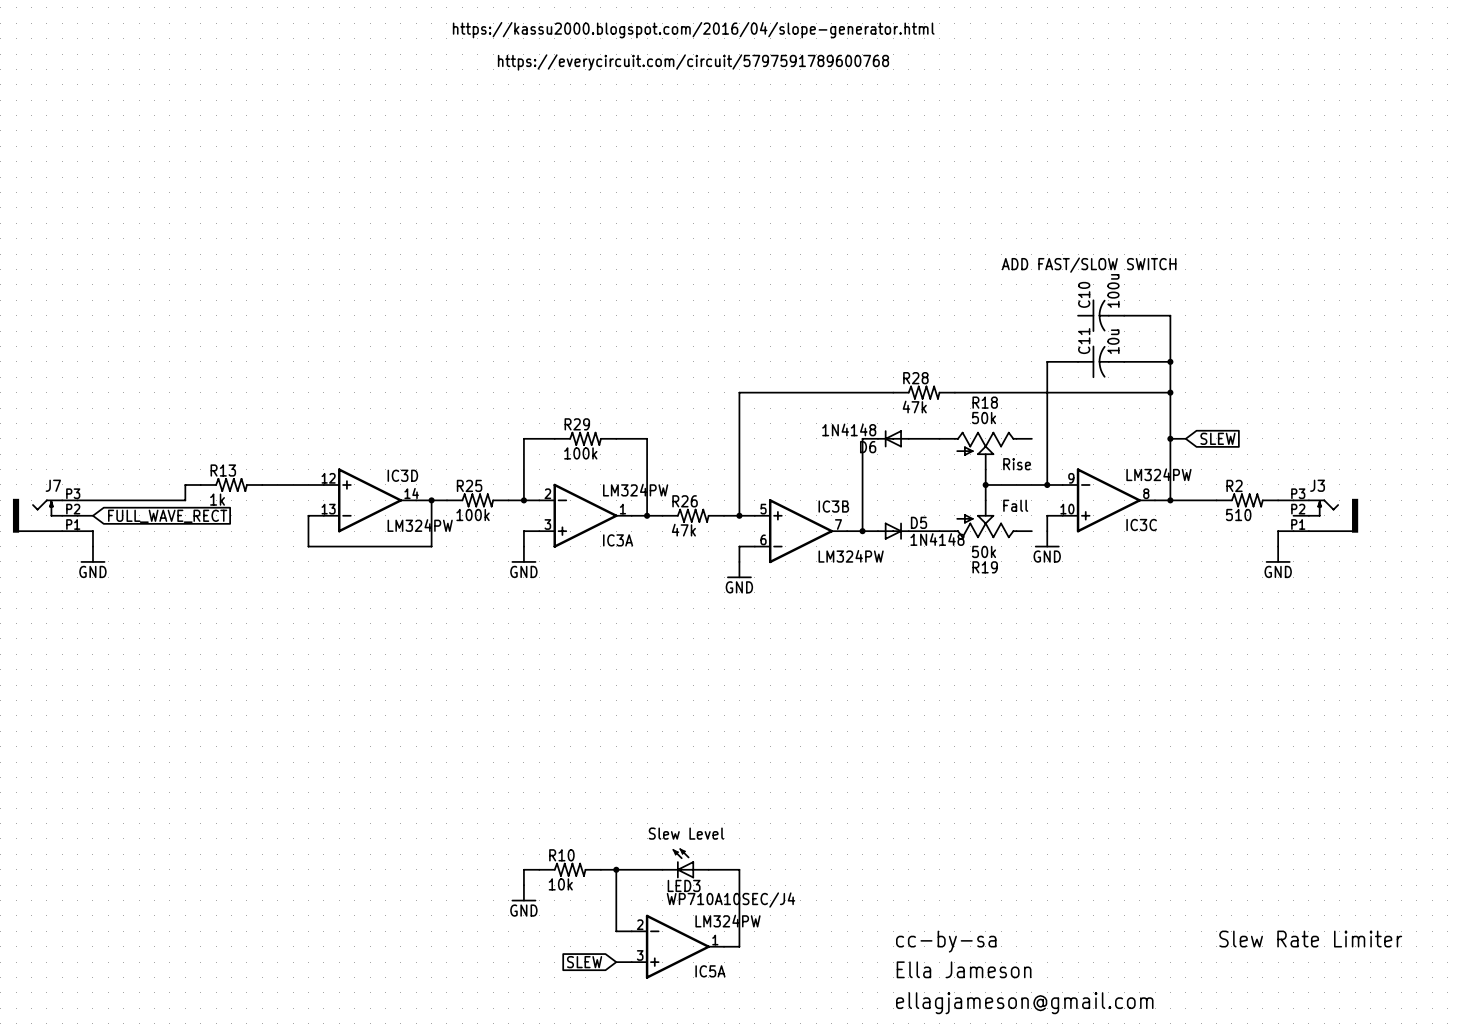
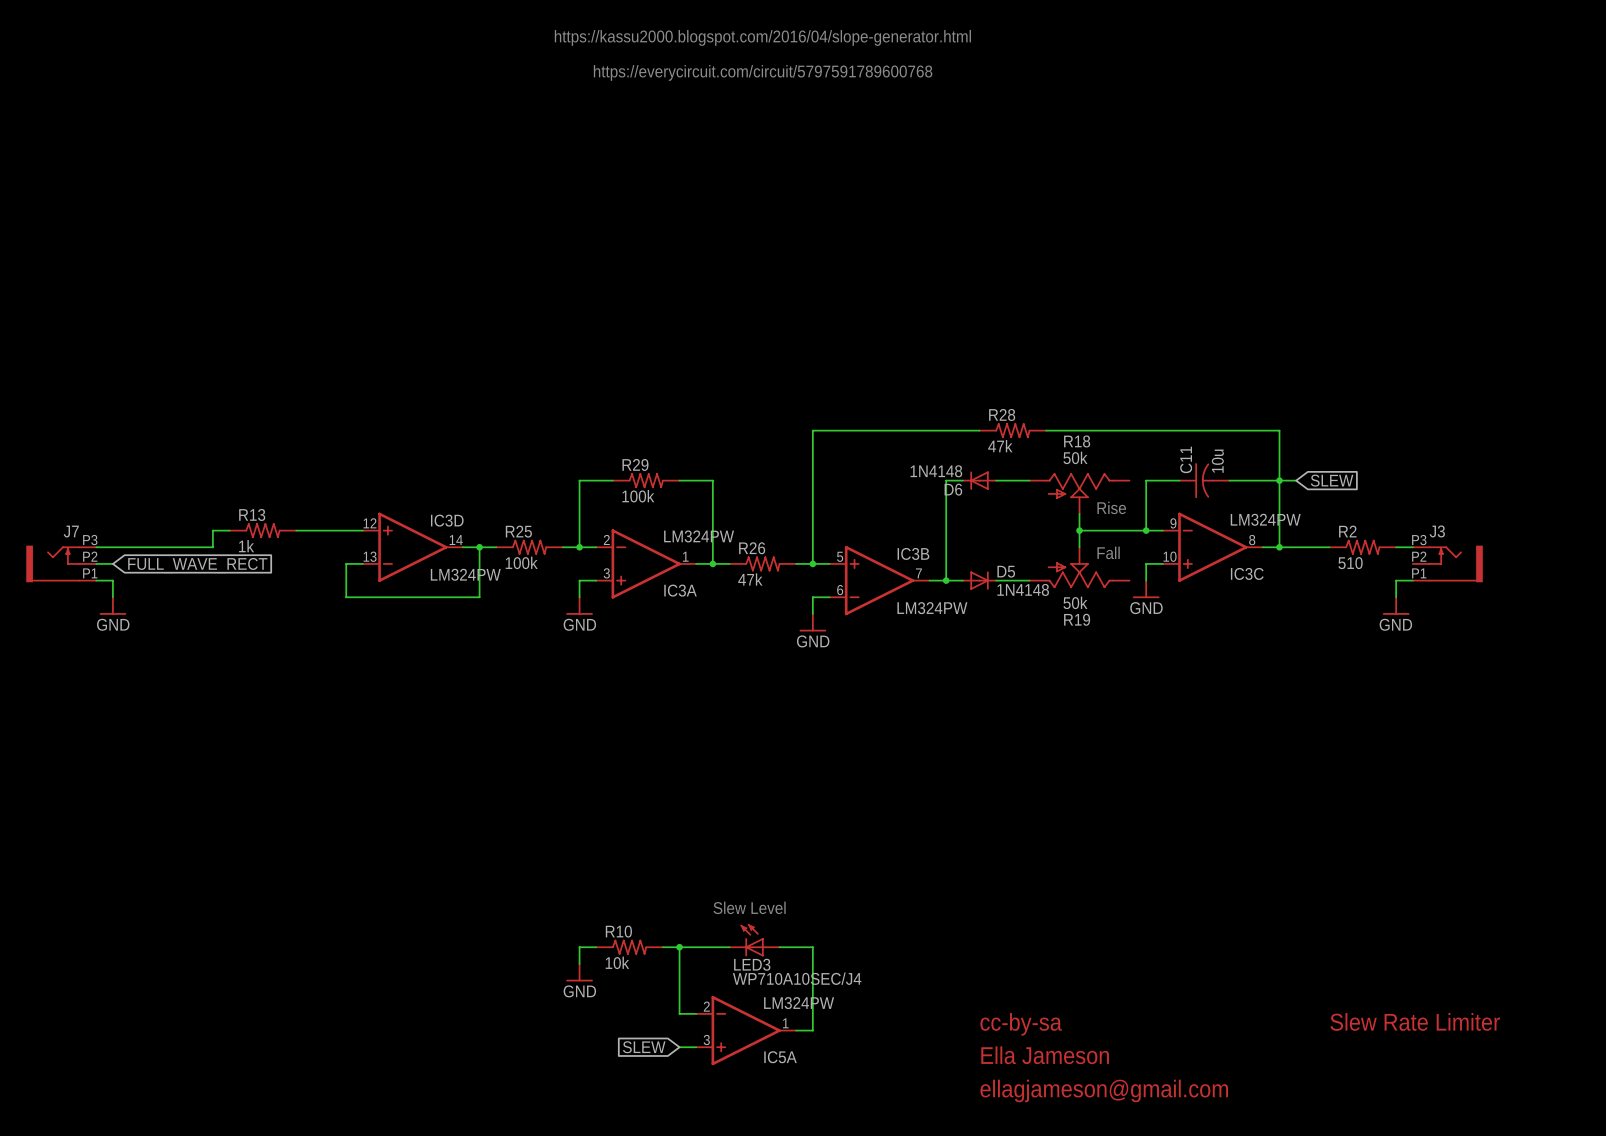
text: ADD FAST/SLOW SWITCH (1089, 265) -> none
C10: 100u (1101, 315) -> none
wire: (1124, 315) (1170, 315) (1170, 392) -> none
wire: (1078, 361) (1047, 361) (1047, 438) -> (1179, 480) (1146, 480)
C11 position: (1101, 361) -> (1204, 480)
wire: (1124, 361) (1170, 361) -> (1229, 480) (1279, 480)
junction: (1170, 361) -> none
junction: (1170, 392) -> none

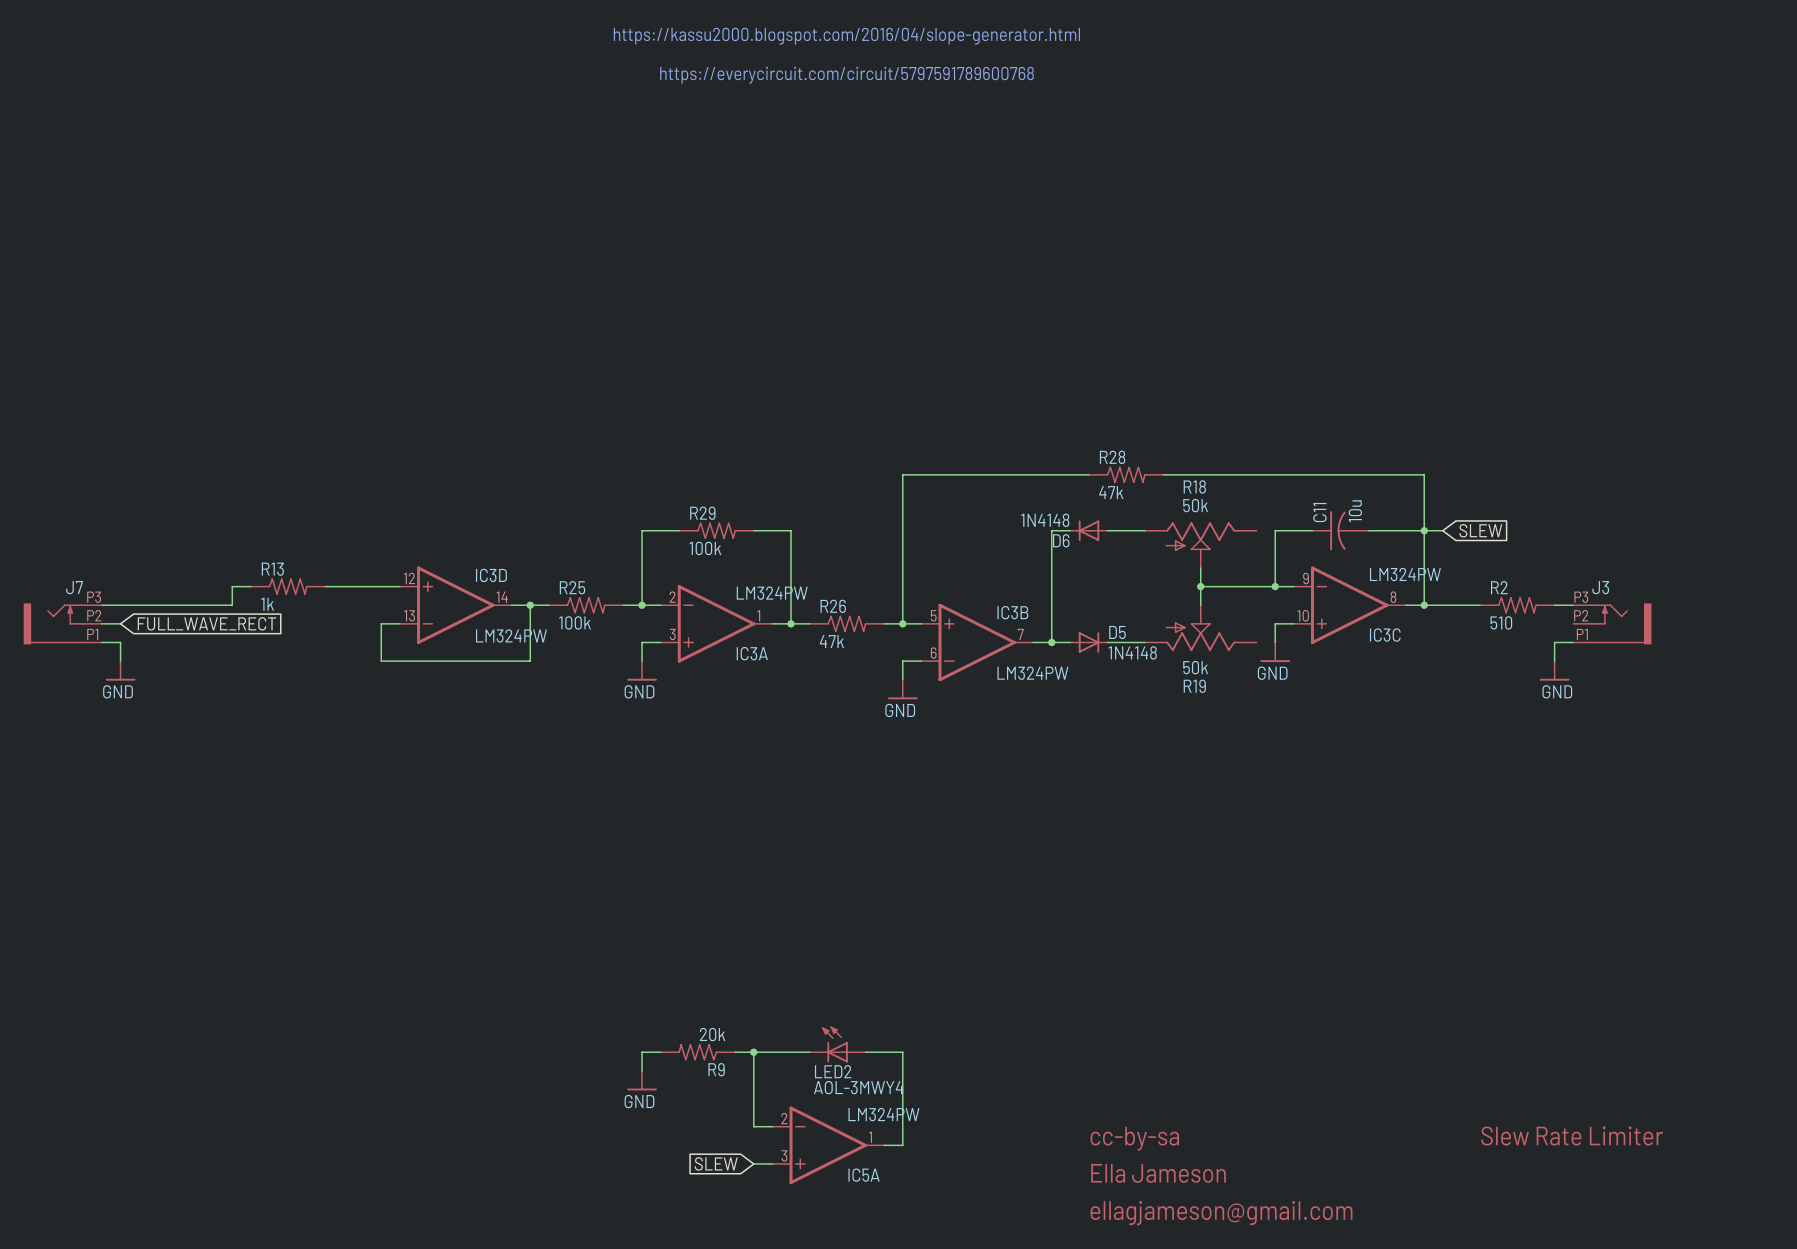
text: Rise (1111, 507) -> none
text: Fall (1108, 552) -> none
text: Slew Level (749, 907) -> none
R10: 10k (629, 947) -> none
R9: none -> 20k (697, 1052)
LED3 name: LED3 (752, 964) -> LED2 (833, 1071)
LED3 value: WP710A10SEC/J4 (797, 978) -> AOL-3MWY4 (858, 1087)

